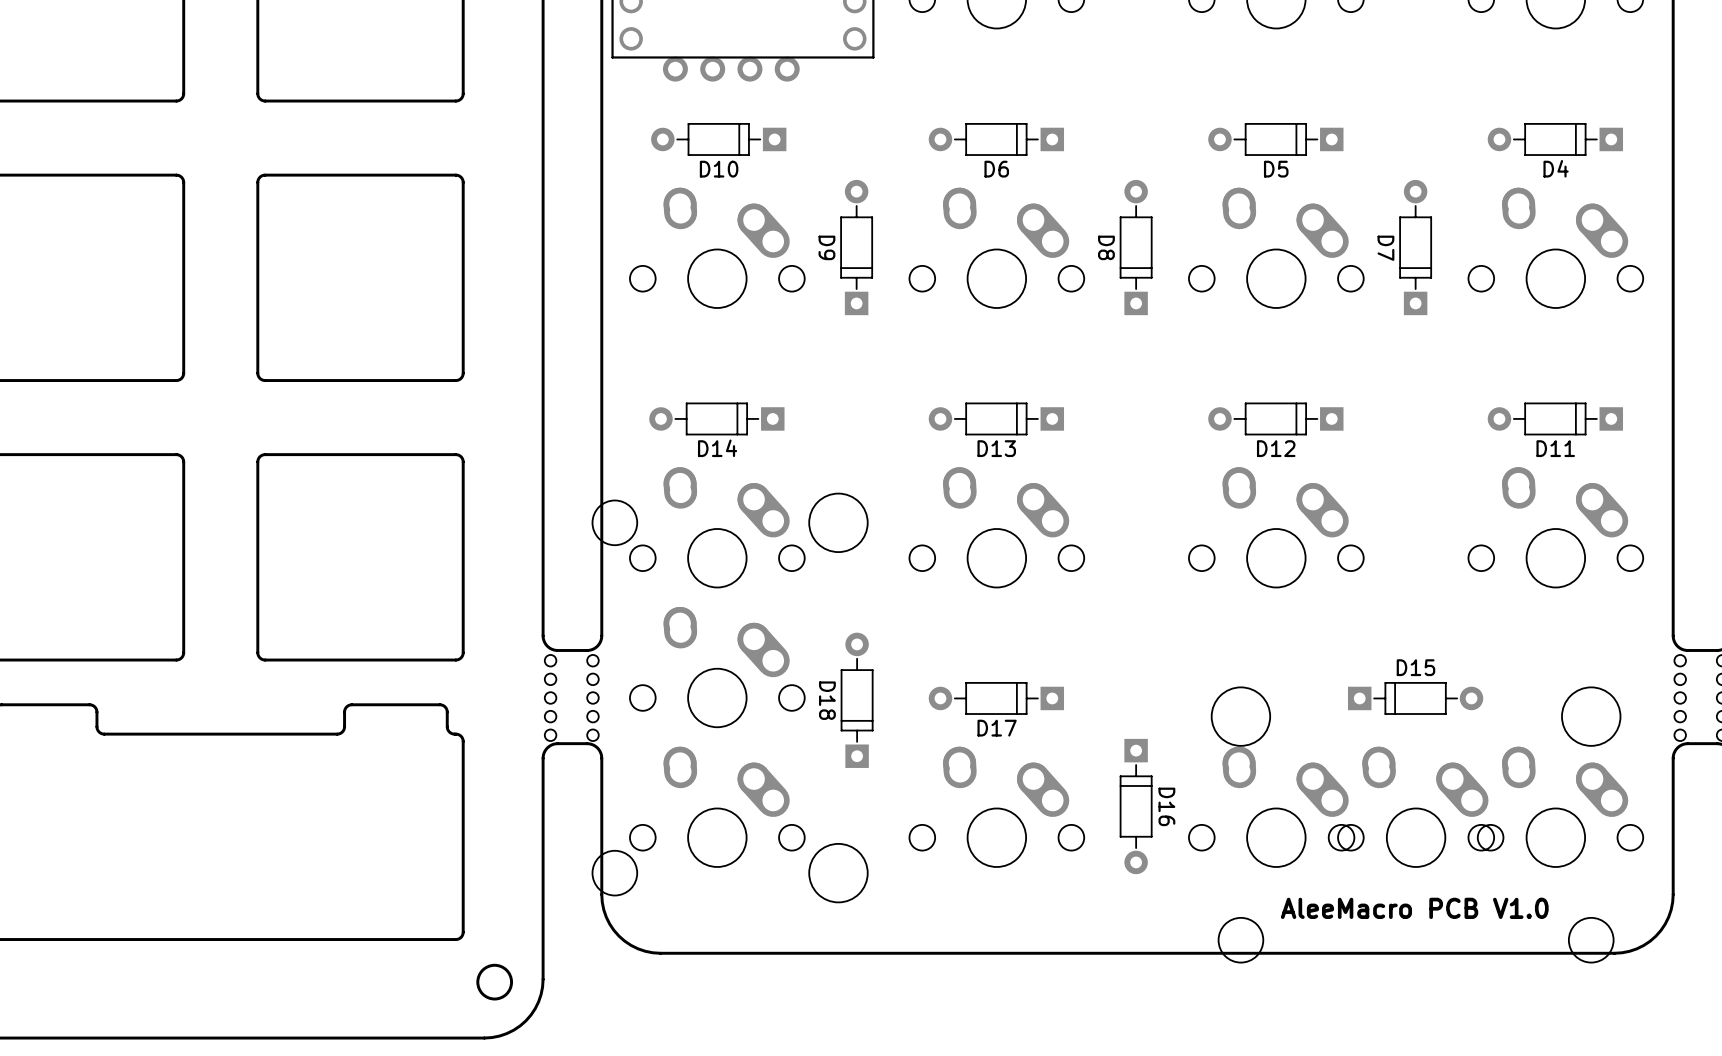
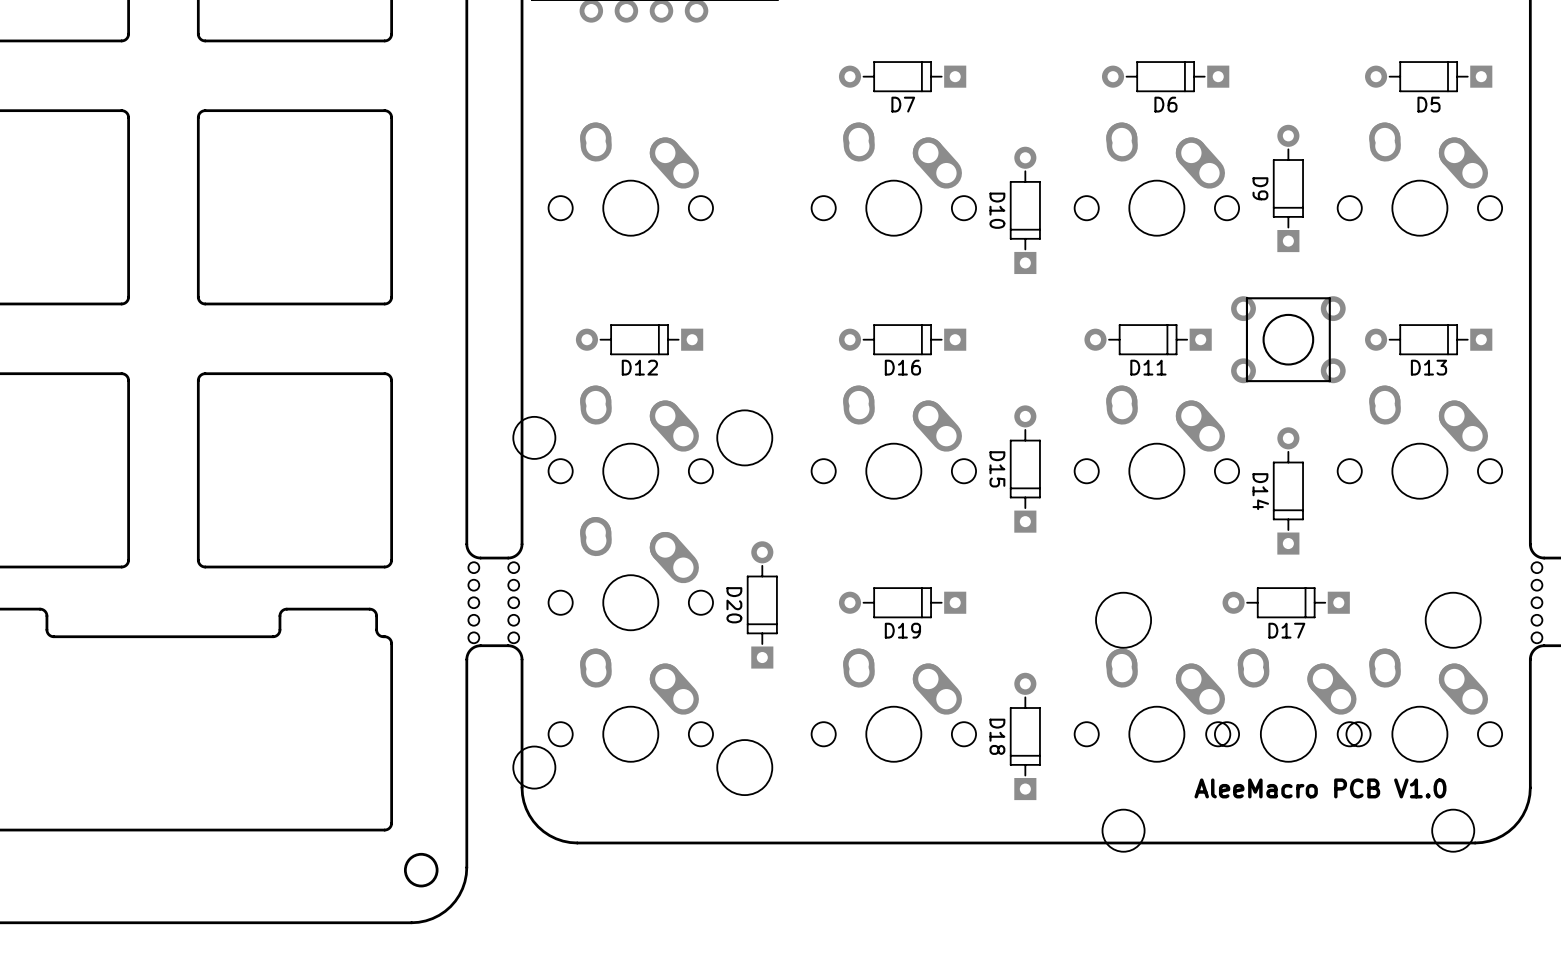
D10 rotation: 0° (718, 139) -> 90° clockwise (1025, 210)
D10 position: (718, 139) -> (1025, 210)
D6 position: (996, 139) -> (1165, 76)
D5 position: (1275, 139) -> (1428, 76)
D4: (1555, 139) -> none
D9 position: (856, 247) -> (1288, 188)
D8: (1136, 247) -> none
D7 rotation: 0° (1415, 247) -> 90° counterclockwise (902, 76)
D7 position: (1415, 247) -> (902, 76)
D14 rotation: 0° (716, 418) -> 90° clockwise (1288, 490)
D14 position: (716, 418) -> (1288, 490)
D13 position: (996, 418) -> (1428, 339)
D12 position: (1275, 418) -> (639, 339)
part: none -> (1288, 339)
D11 position: (1555, 418) -> (1148, 339)
D19: none -> (902, 602)
D17 position: (996, 698) -> (1286, 602)
D15 rotation: 0° (1415, 698) -> 90° counterclockwise (1025, 469)
D15 position: (1415, 698) -> (1025, 469)
D18 name: D18 (827, 700) -> D20 (734, 605)
D16 rotation: 0° (1136, 806) -> 90° clockwise (902, 339)
D16 position: (1136, 806) -> (902, 339)
D18: none -> (1025, 736)
text position: AleeMacro PCB V1.0 (1414, 908) -> AleeMacro PCB V1.0 (1320, 788)

